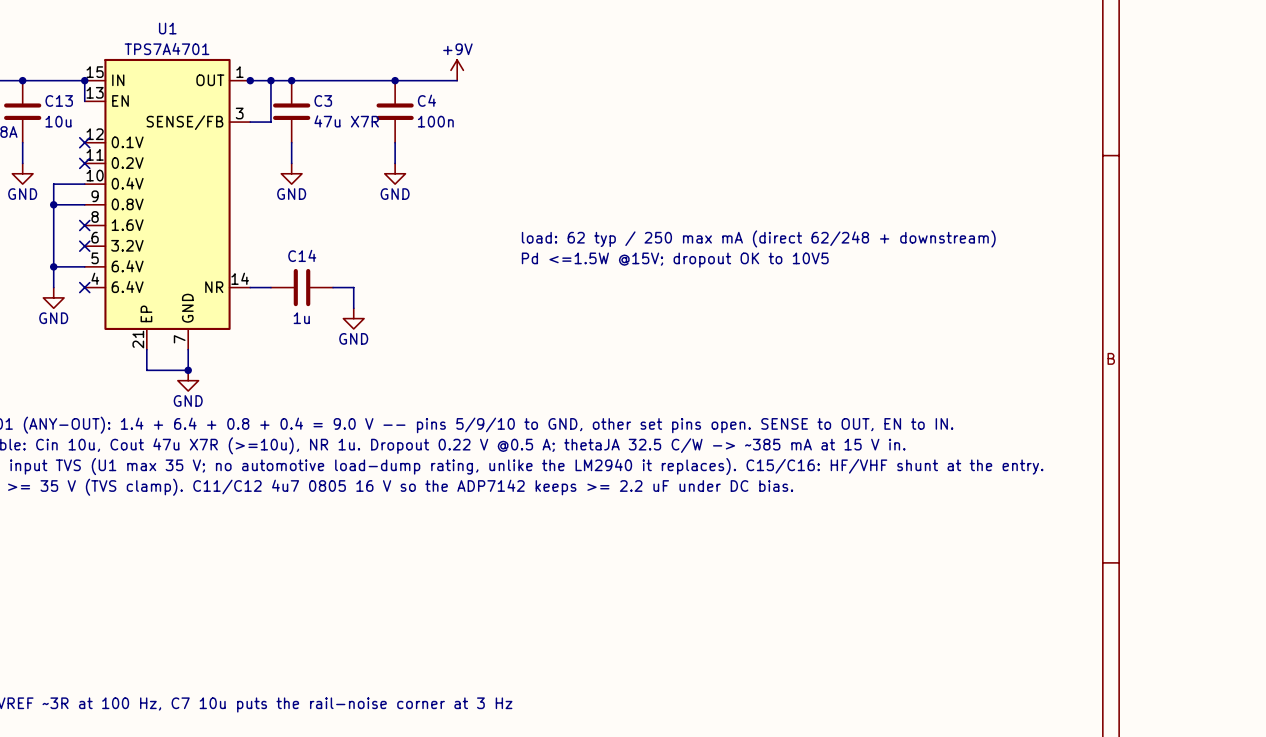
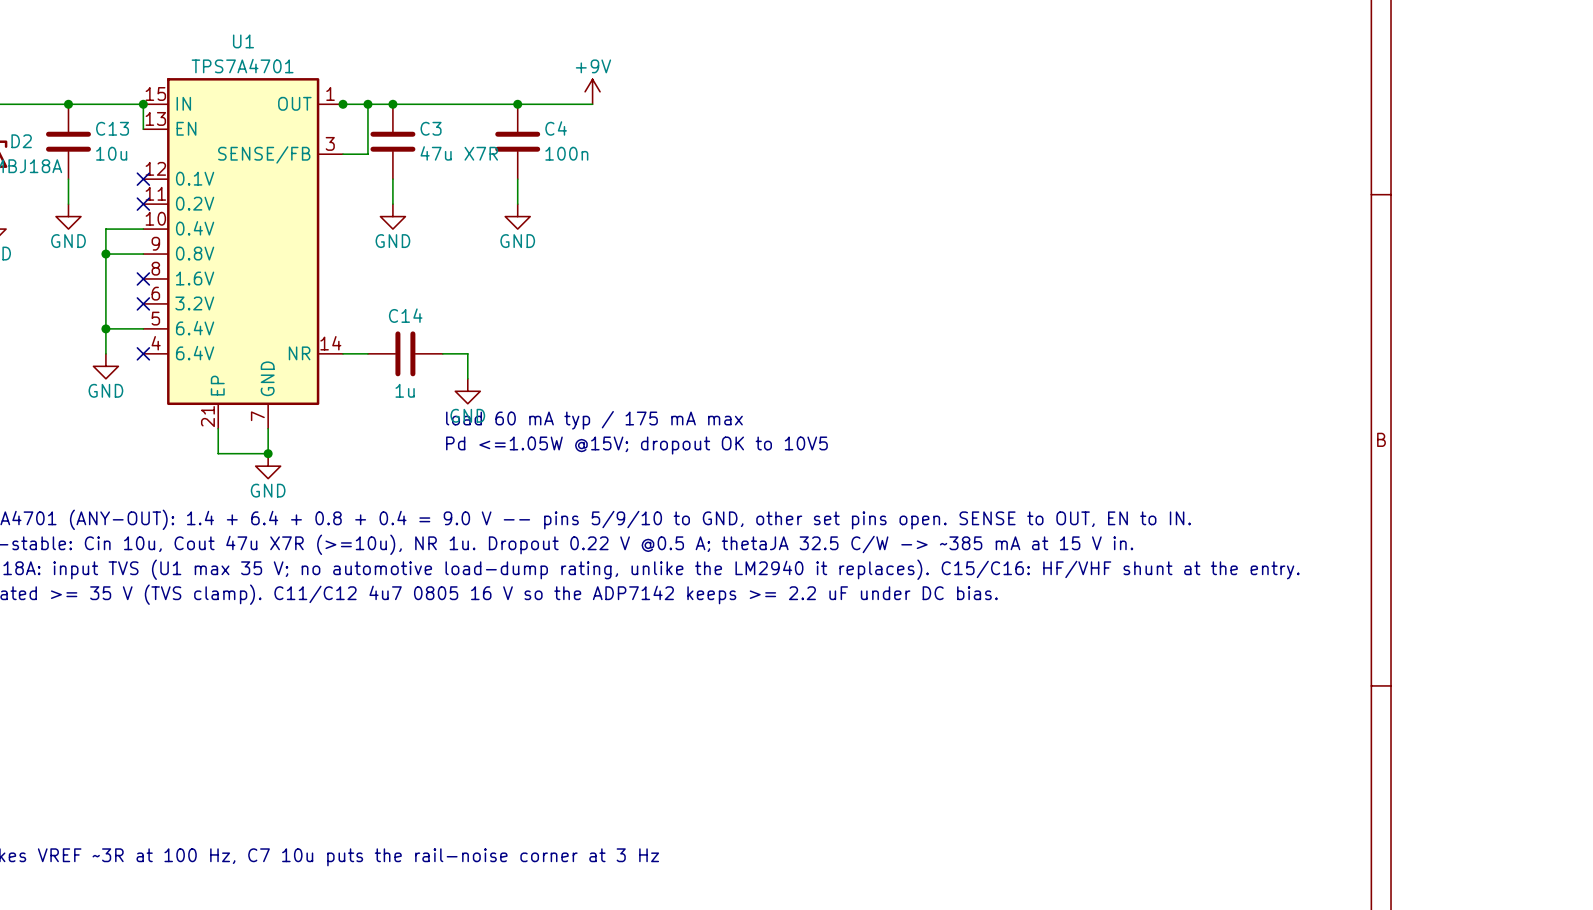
text: load: 62 typ / 250 max mA (direct 62/248 + downstream) (758, 238) -> none
text: Pd <=1.5W @15V; dropout OK to 10V5 (675, 260) -> none
text: none -> load 60 mA typ / 175 mA max (594, 420)
text: none -> Pd <=1.05W @15V; dropout OK to 10V5 (636, 445)

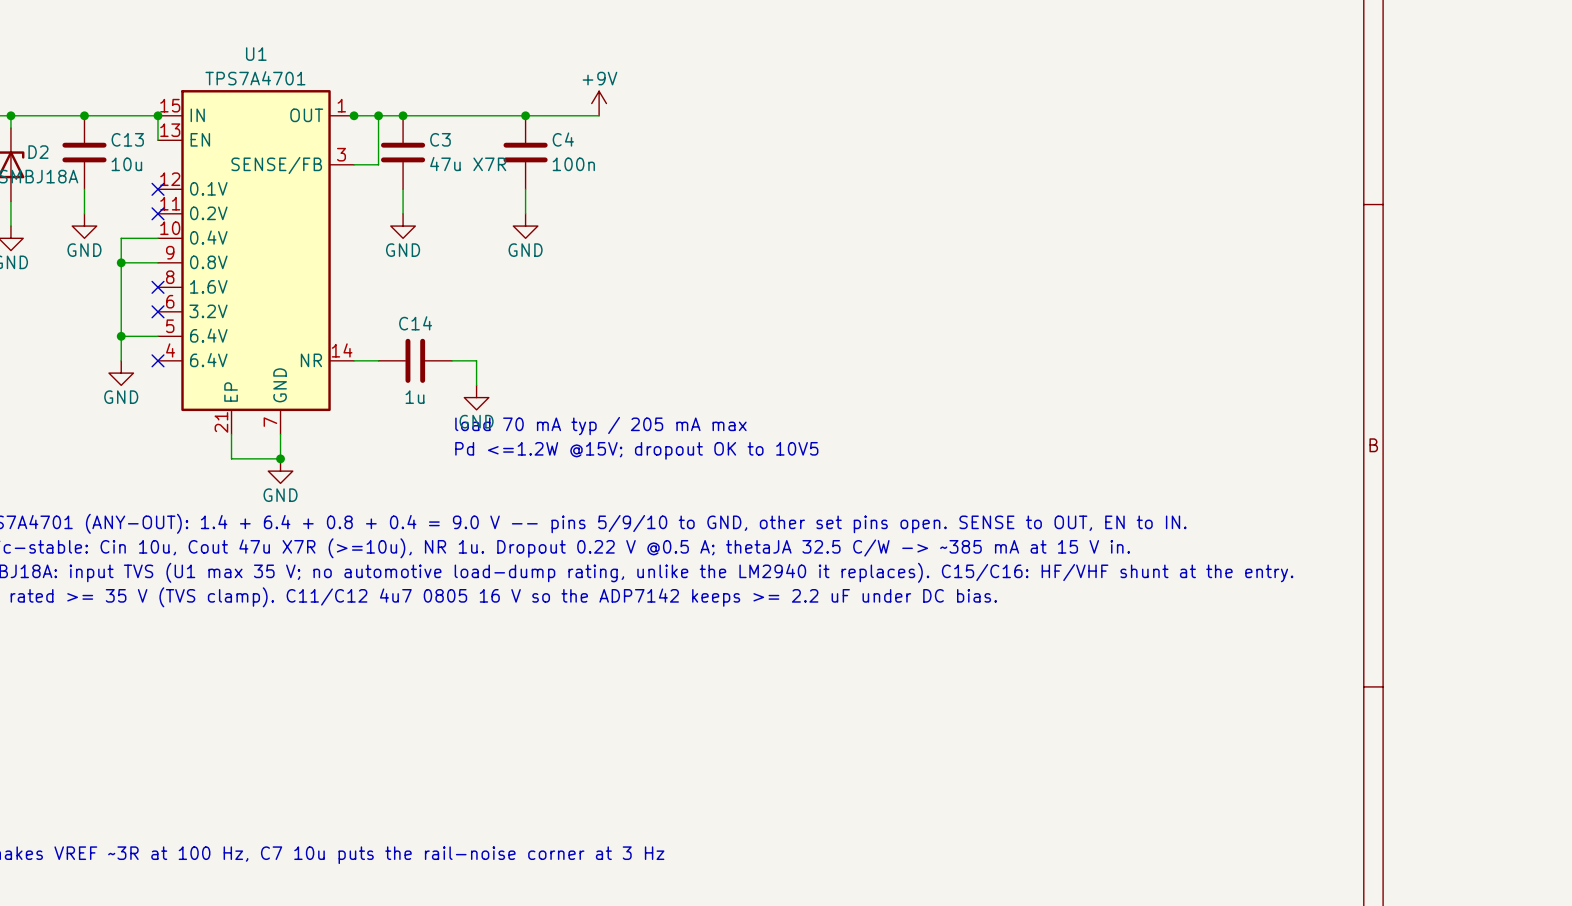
text: load 60 mA typ / 175 mA max (594, 420) -> load 70 mA typ / 205 mA max (600, 426)
text: Pd <=1.05W @15V; dropout OK to 10V5 (636, 445) -> Pd <=1.2W @15V; dropout OK to 10V5 (636, 450)

